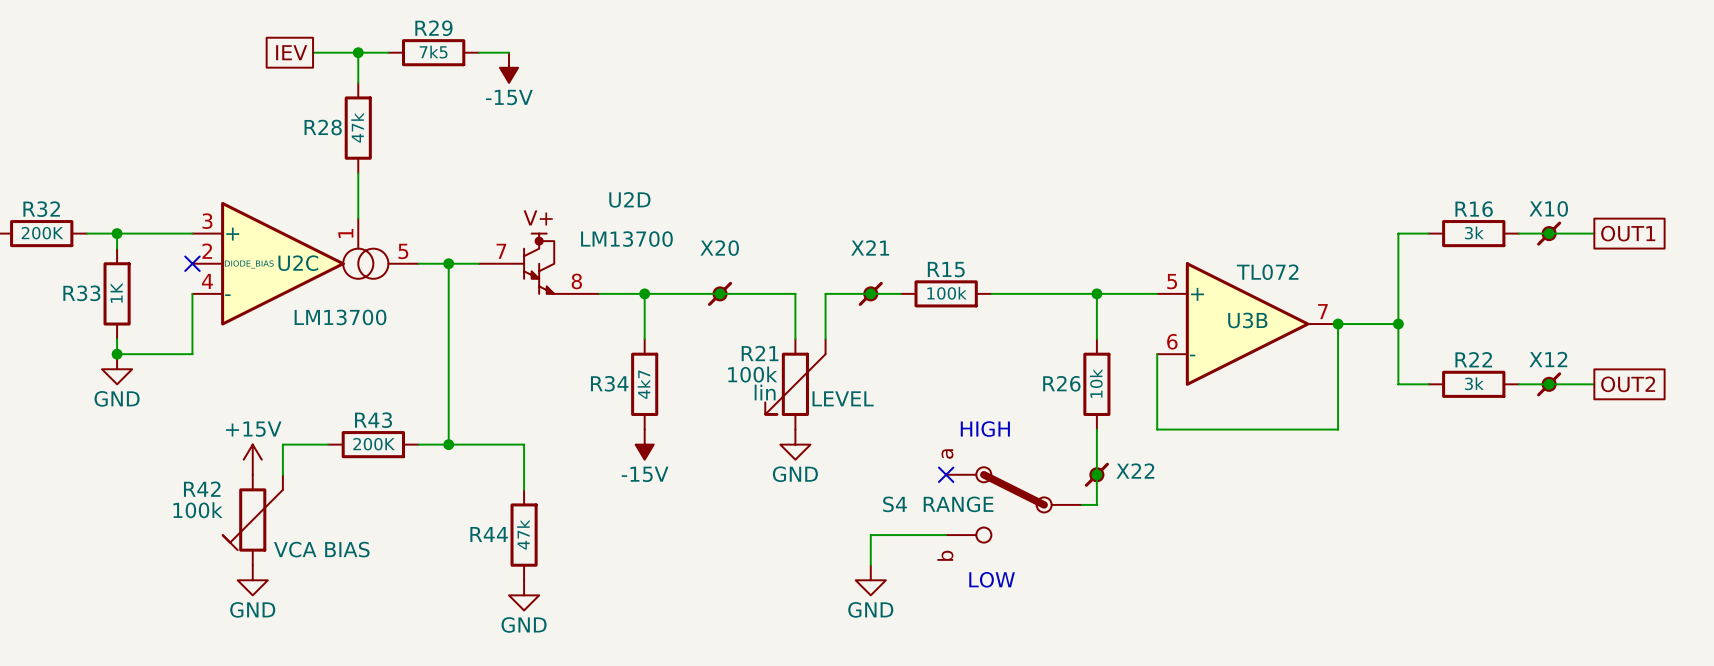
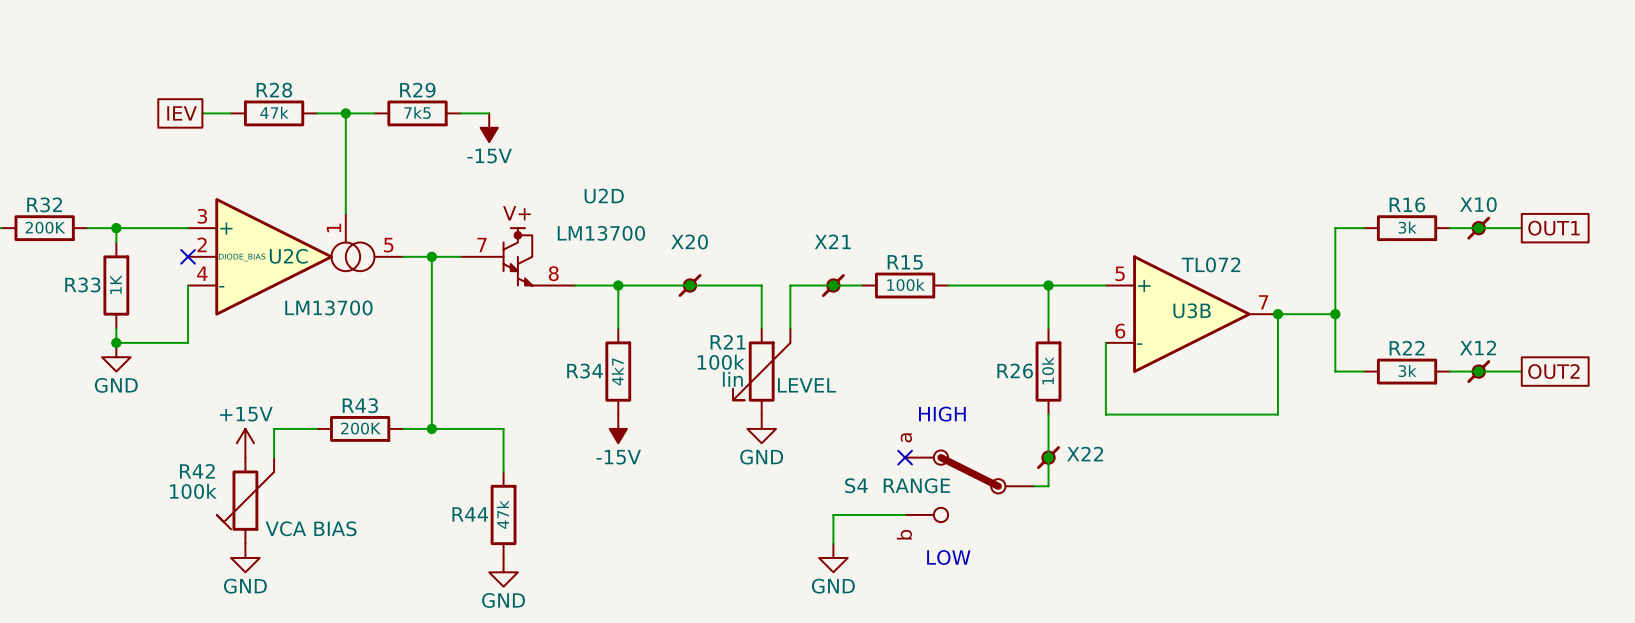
global label position: IEV (291, 52) -> IEV (182, 113)
wire: (313, 52) (388, 52) -> none
wire: (358, 52) (358, 82) -> none
junction position: (358, 52) -> (345, 113)
R29 position: (433, 52) -> (417, 113)
wire: (478, 52) (509, 52) -> (460, 113) (489, 113)
power symbol position: -15V (509, 67) -> -15V (489, 127)
wire: none -> (202, 113) (231, 113)
wire: none -> (317, 113) (374, 113)
wire: none -> (345, 113) (345, 170)
R28 rotation: 0° (358, 128) -> 90° clockwise (274, 113)
R28 position: (358, 128) -> (274, 113)

